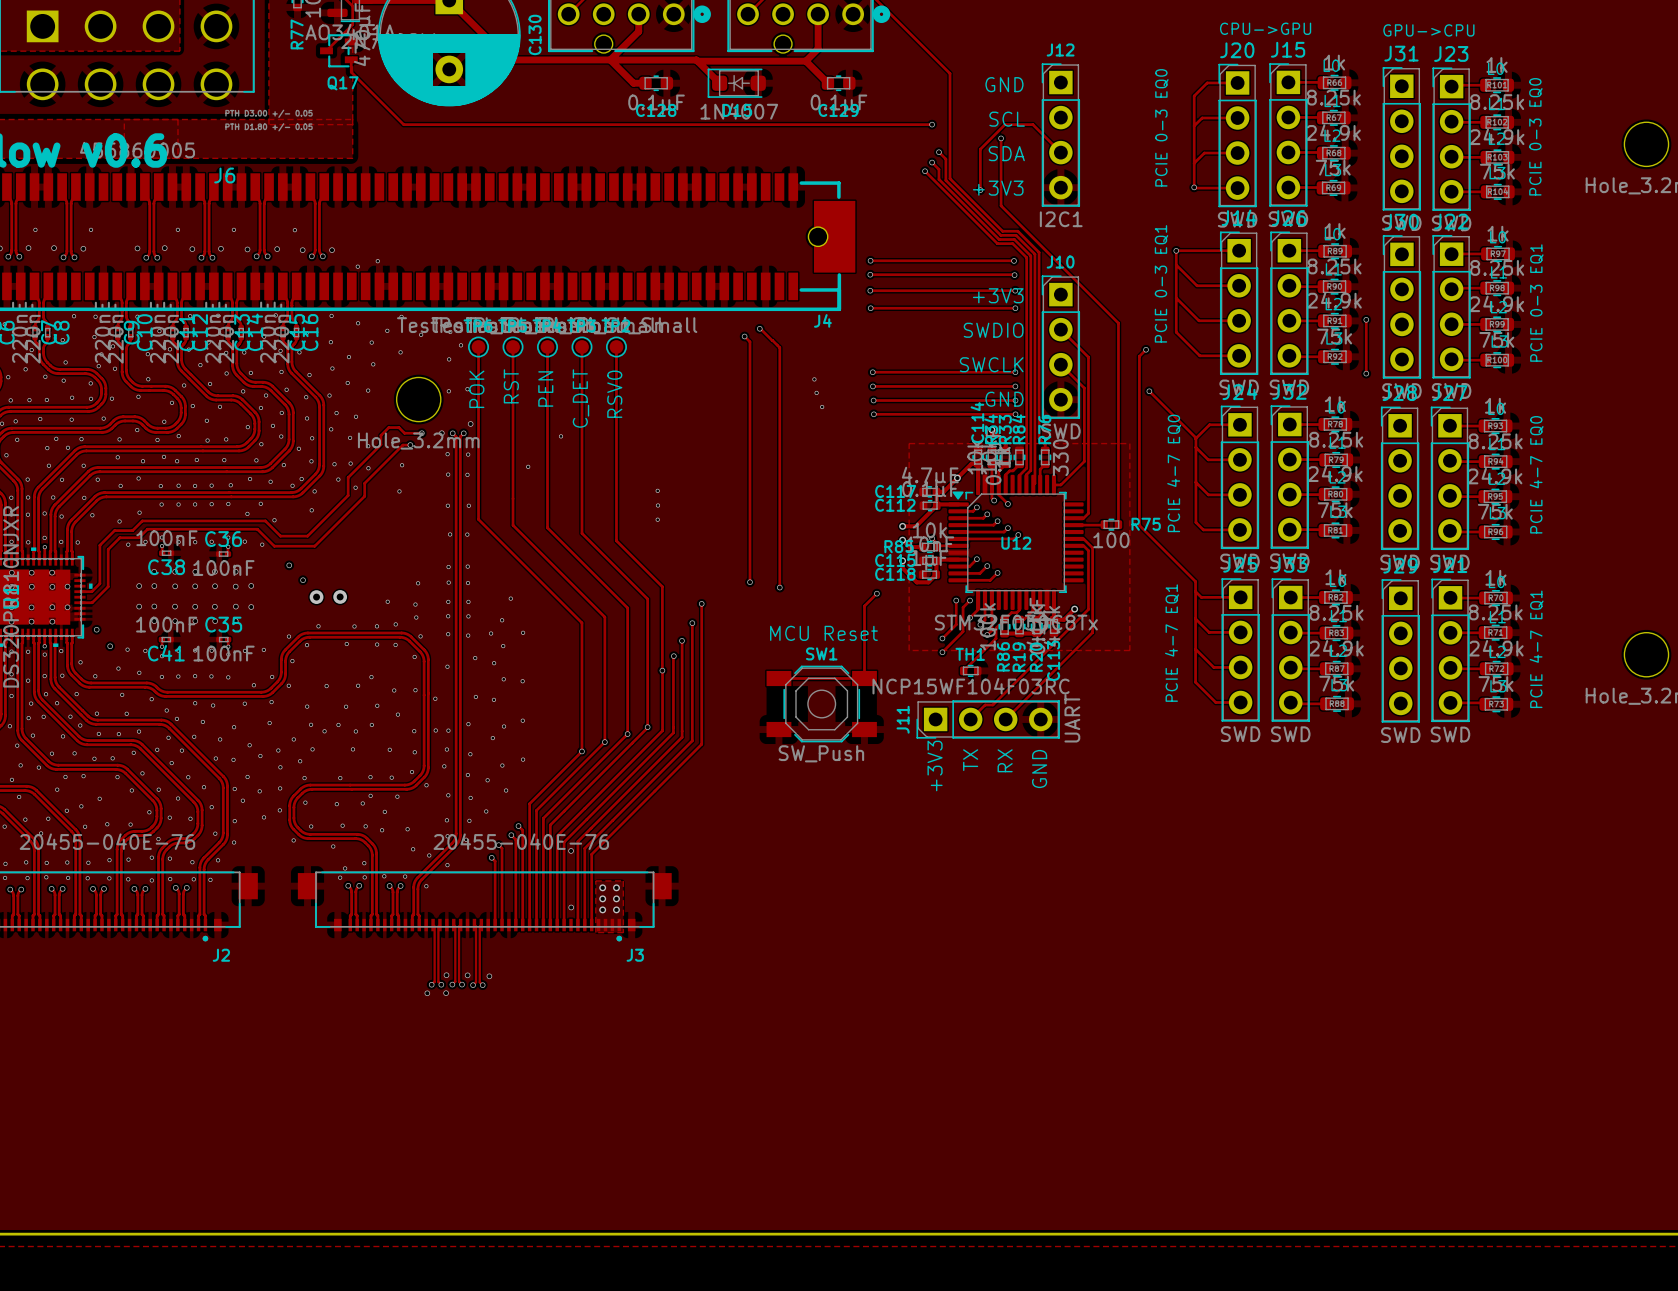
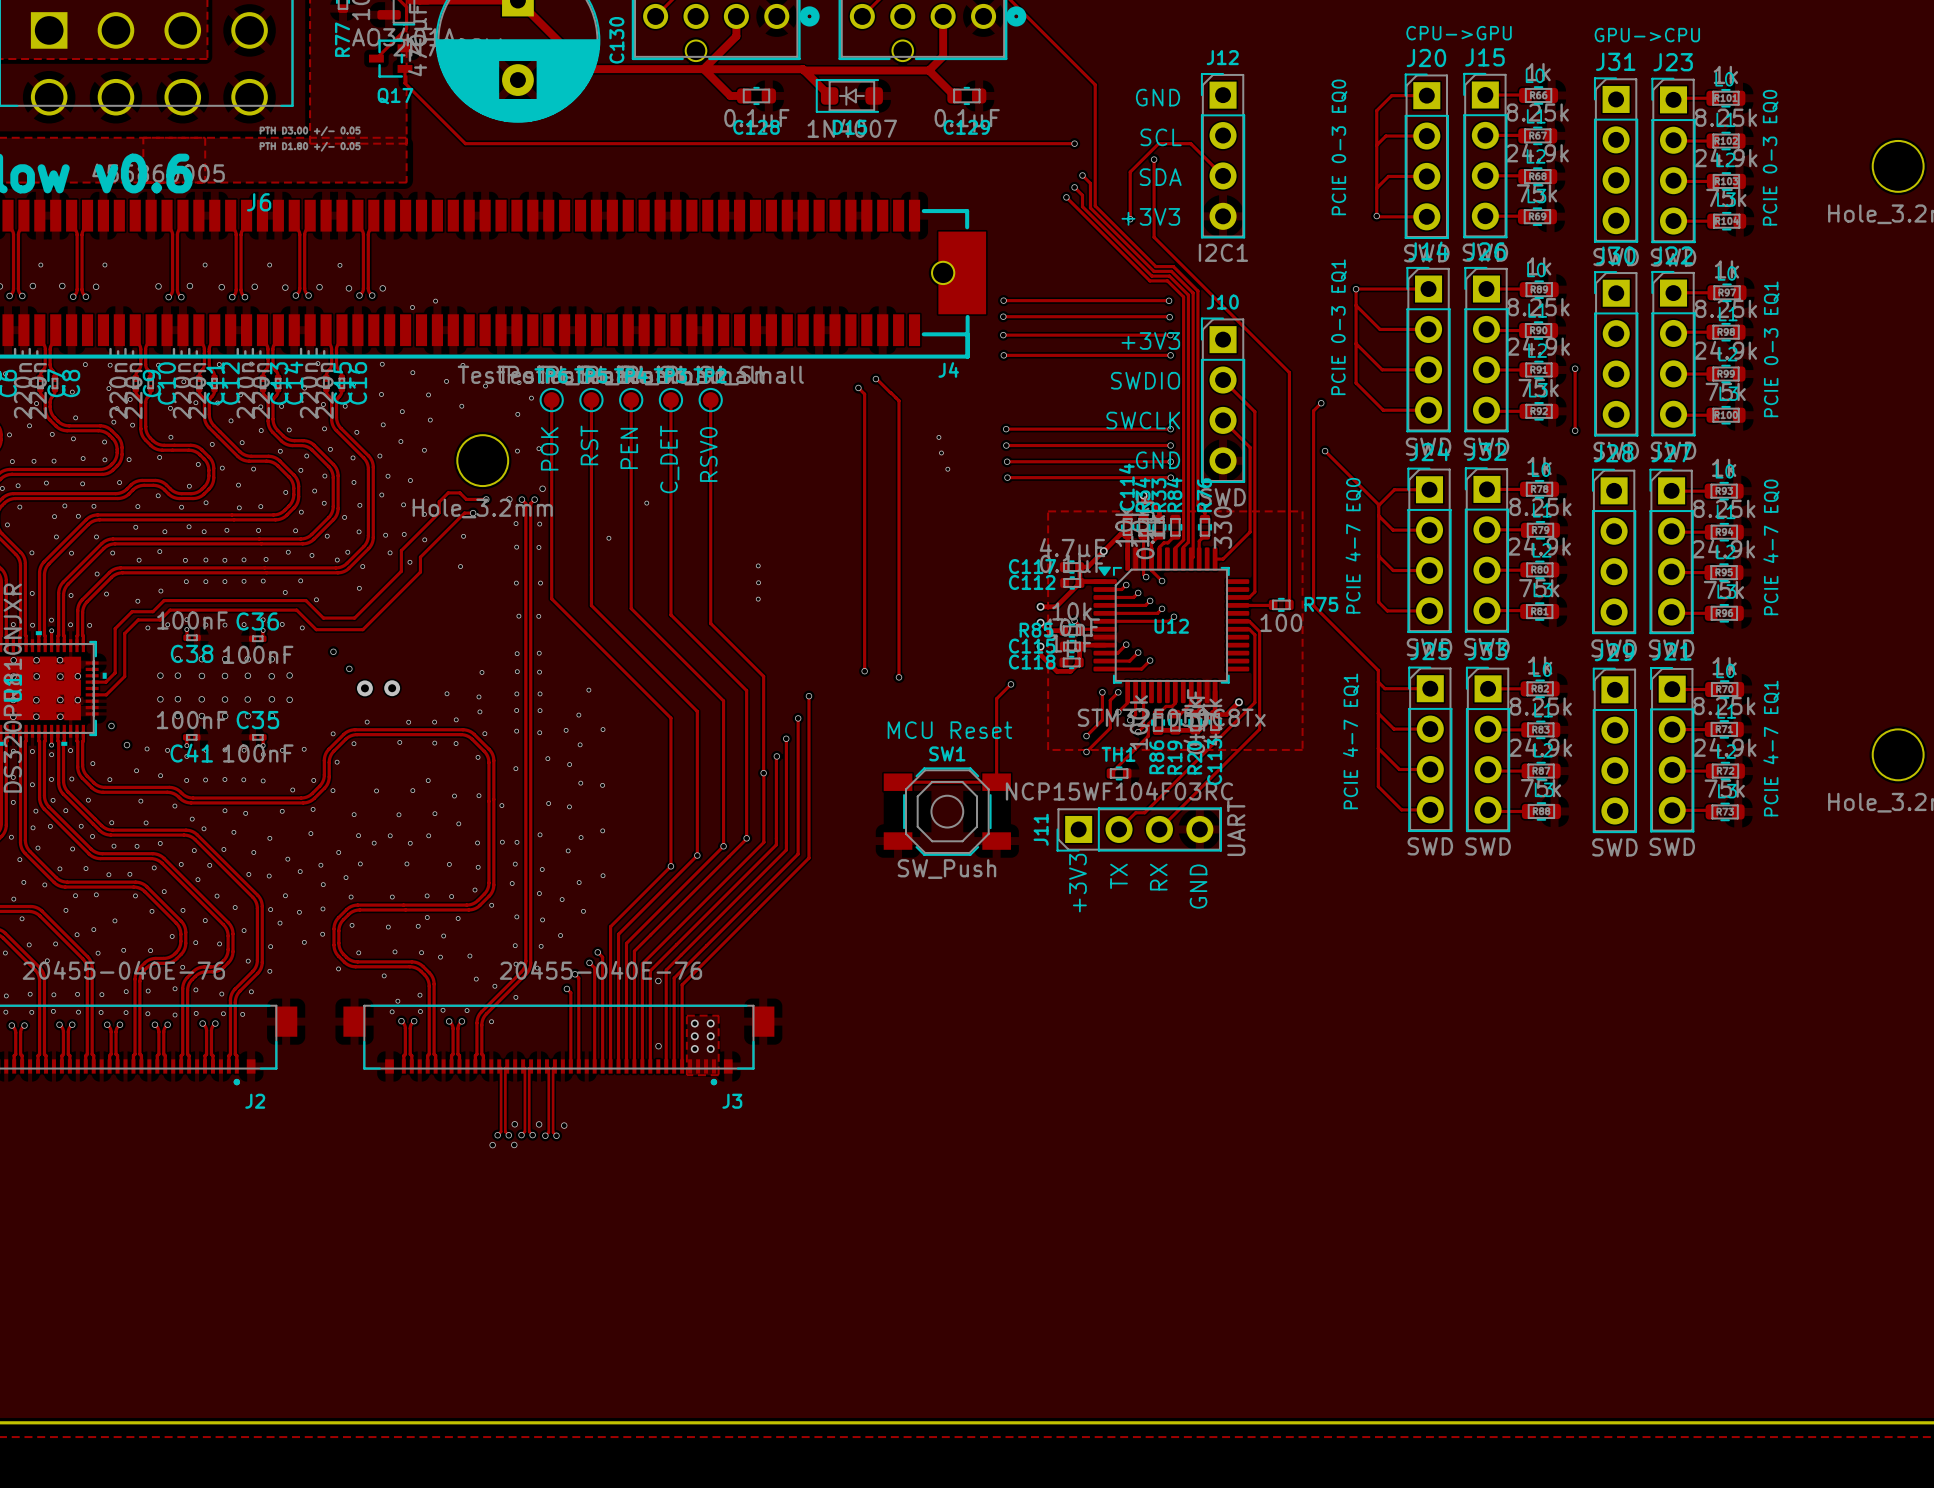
via: (11, 497) -> none
via: (28, 497) -> none
via: (53, 497) -> none
via: (44, 513) -> none

